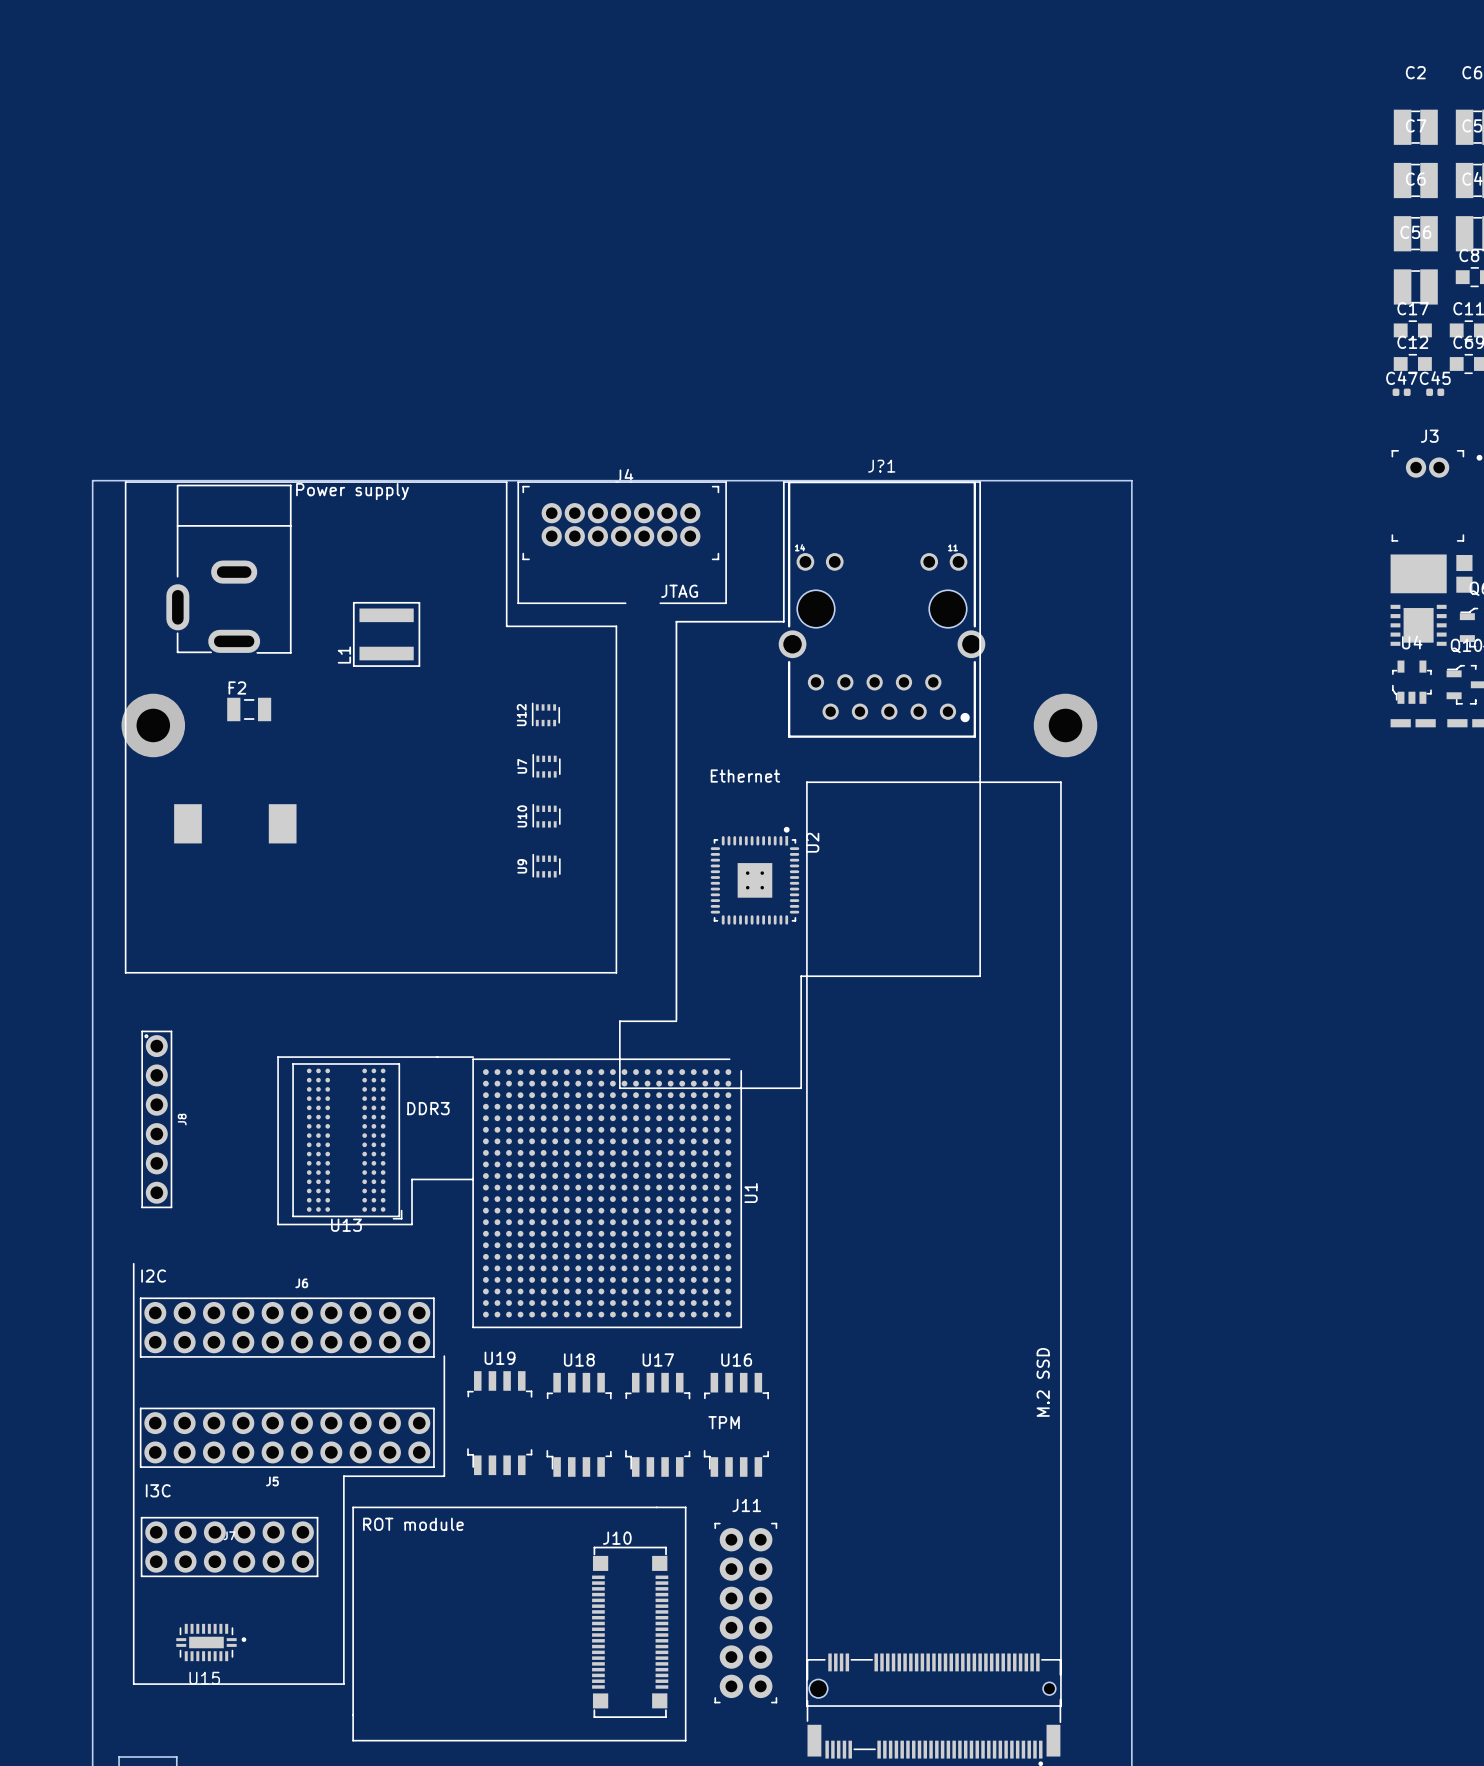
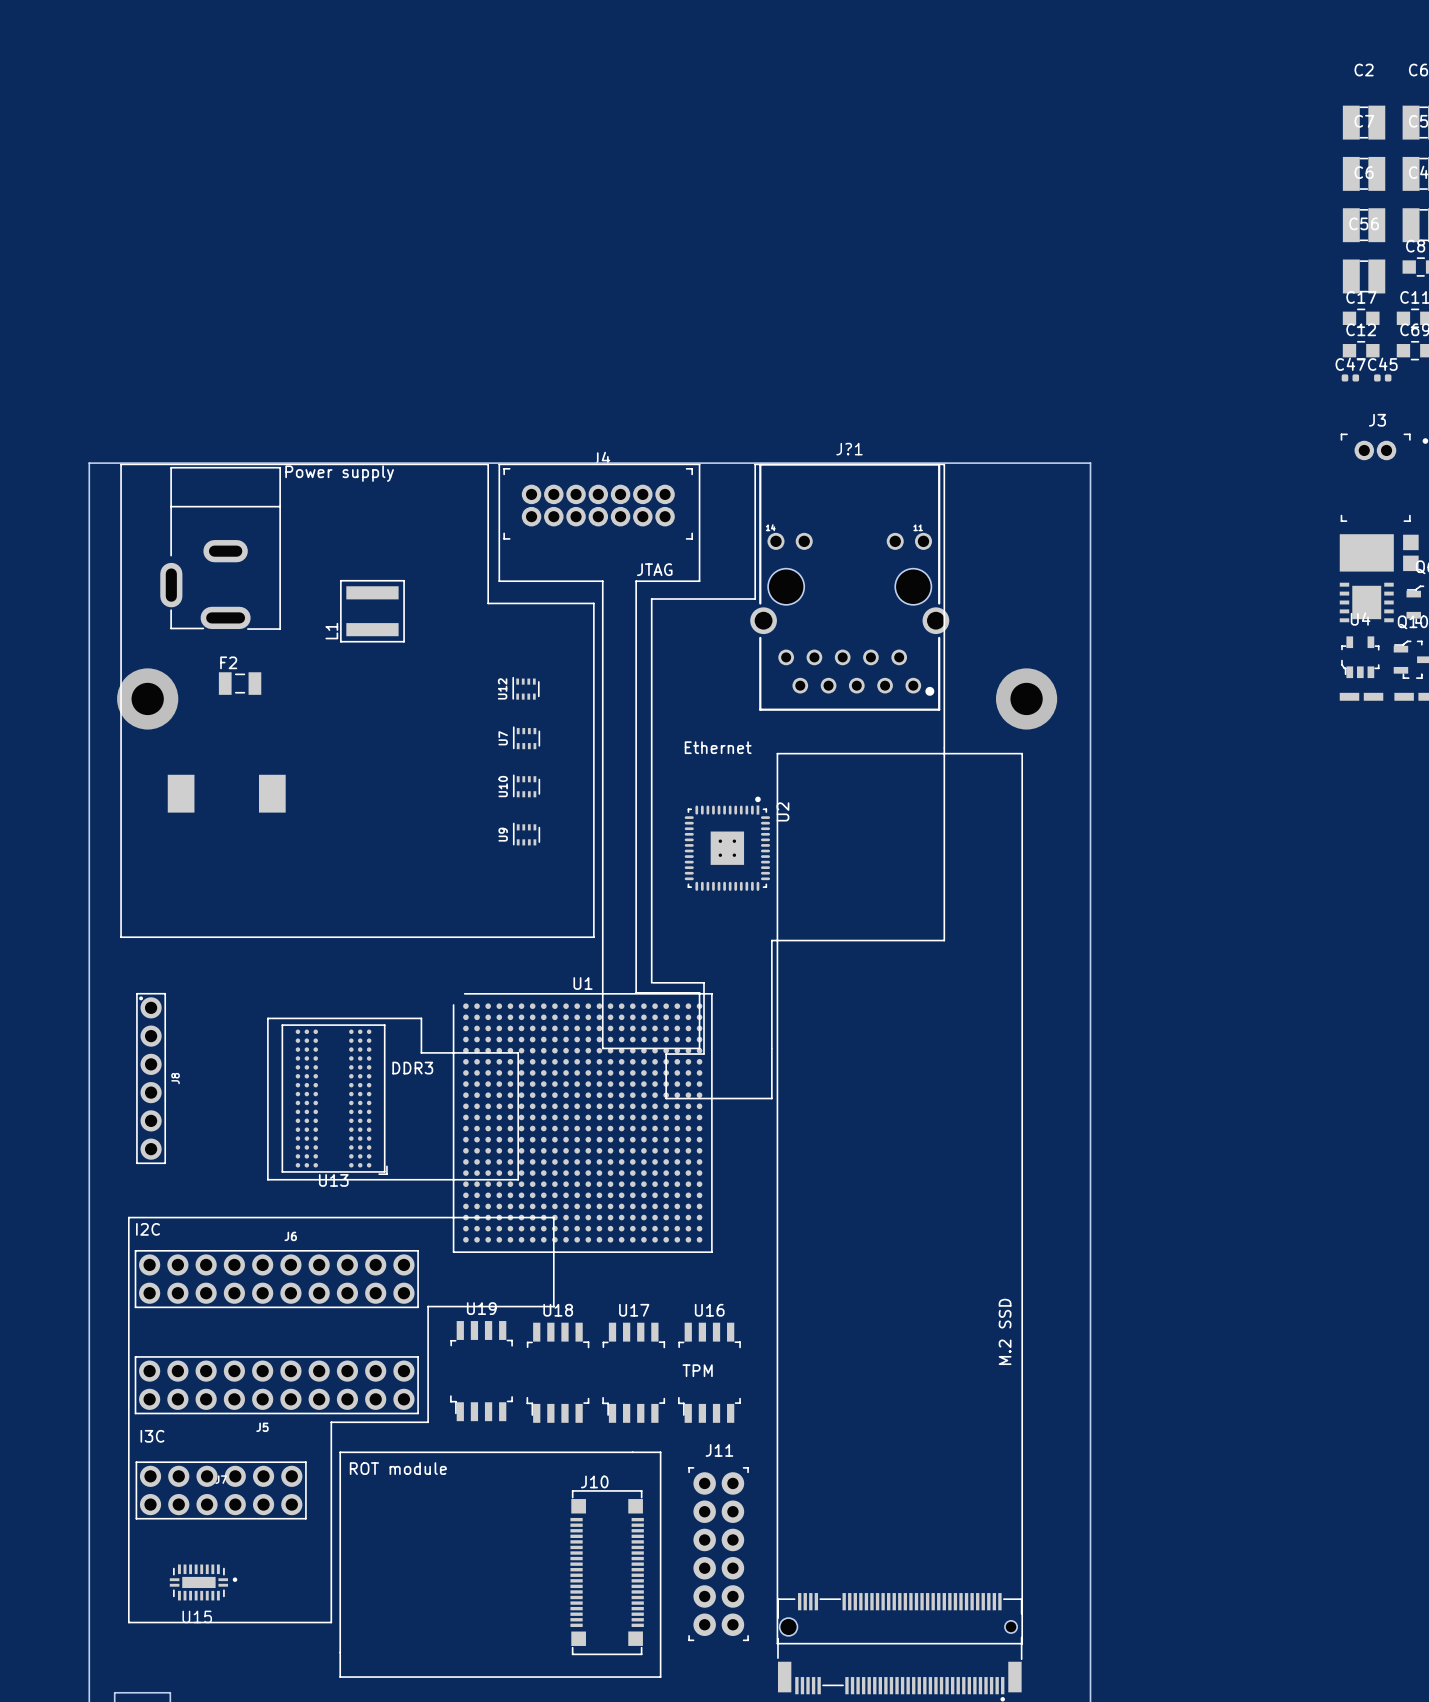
line: none -> (636, 581) (636, 992) (699, 992) (699, 1048)
line: (676, 1021) (619, 1021) (619, 1088) (625, 1088) -> (602, 581) (602, 1048)
line: (437, 1057) (473, 1057) -> none
line: (726, 1088) (801, 1088) -> (652, 982) (704, 982) (704, 1054) (666, 1054) (666, 1098) (771, 1098) (771, 1048)
line: (473, 1179) (412, 1179) (412, 1224) -> (421, 1018) (421, 1052) (518, 1052) (518, 1179) (396, 1179)
U1 rotation: 0° (607, 1193) -> 90° counterclockwise (582, 1123)
line: none -> (128, 1217) (553, 1217) (553, 1306) (428, 1306)

